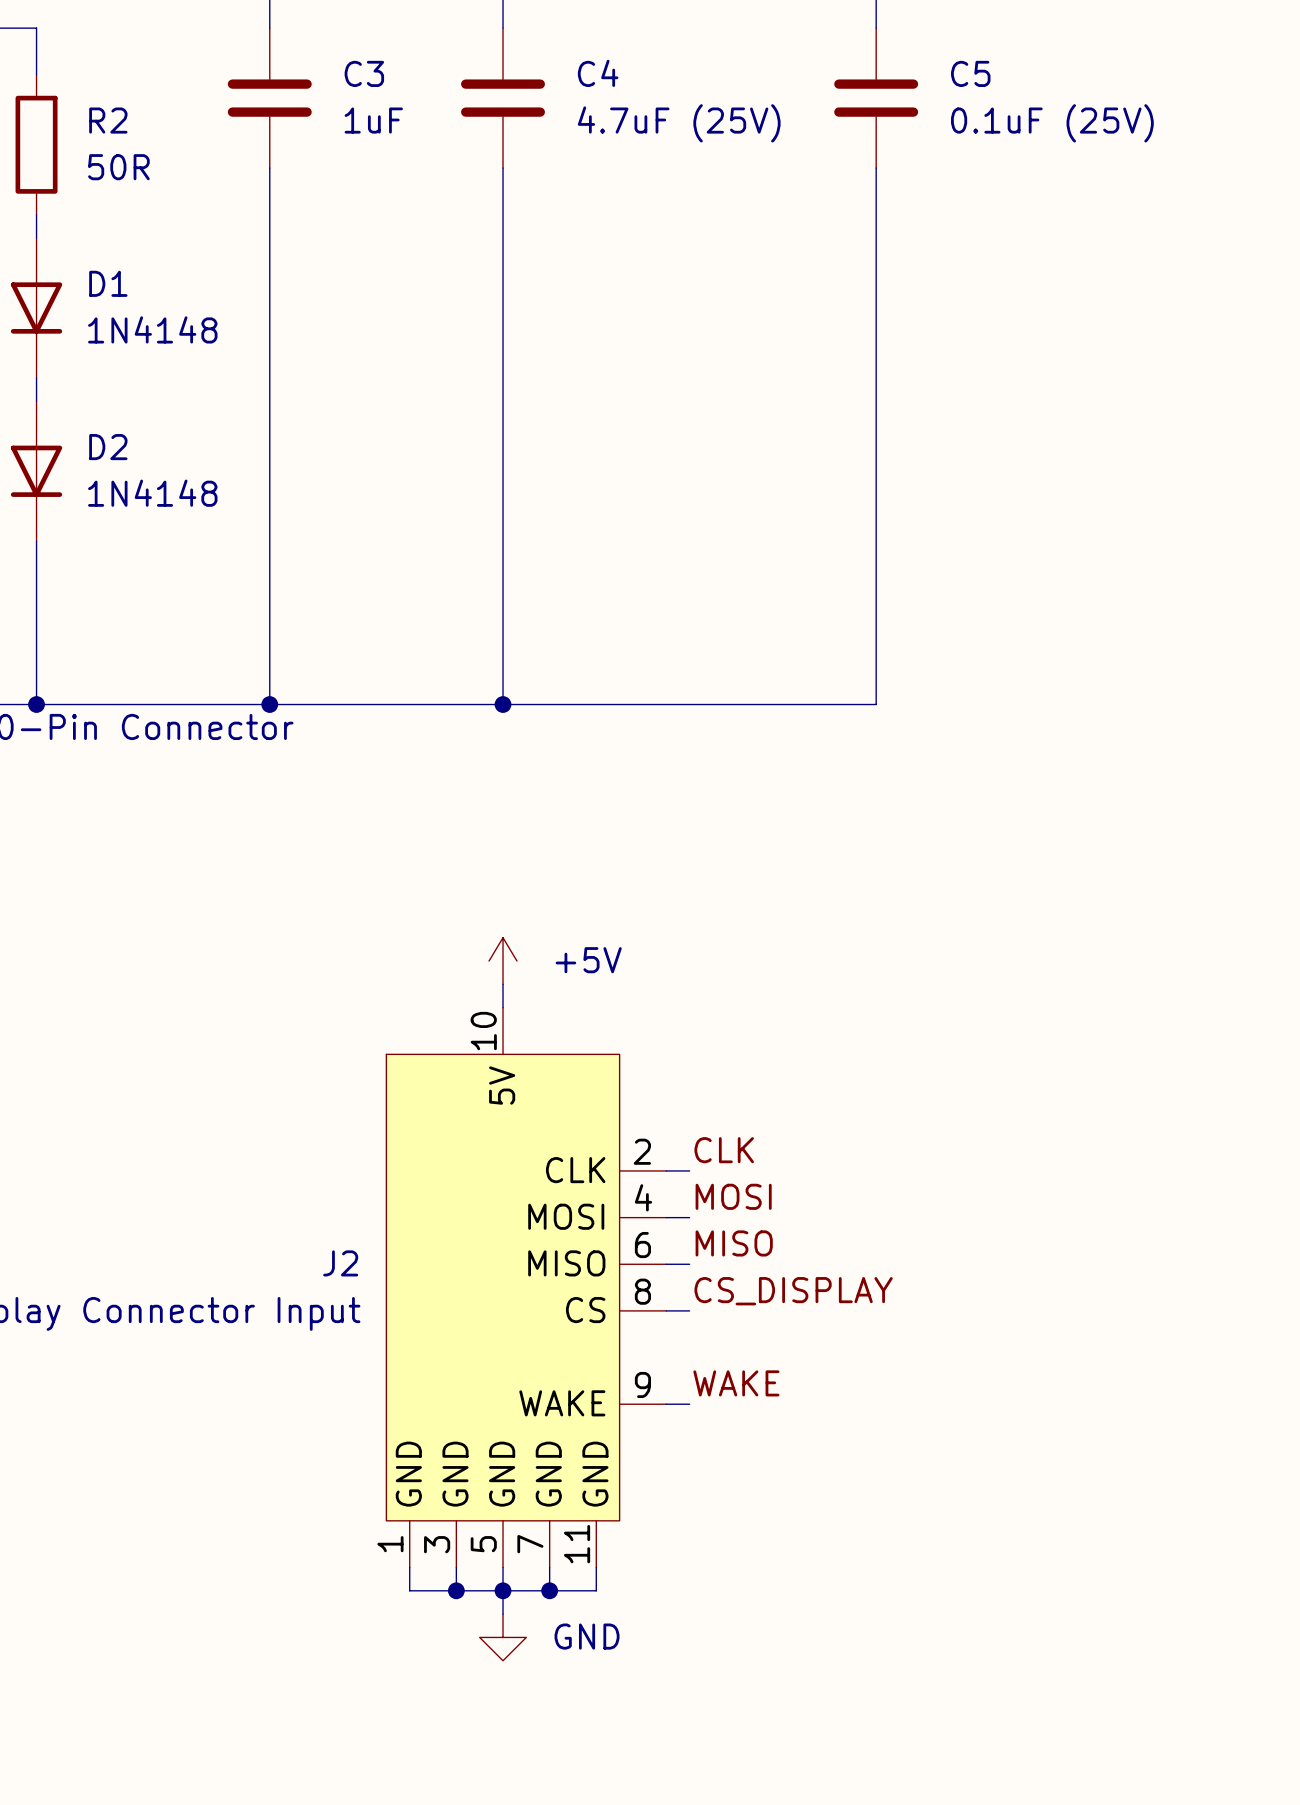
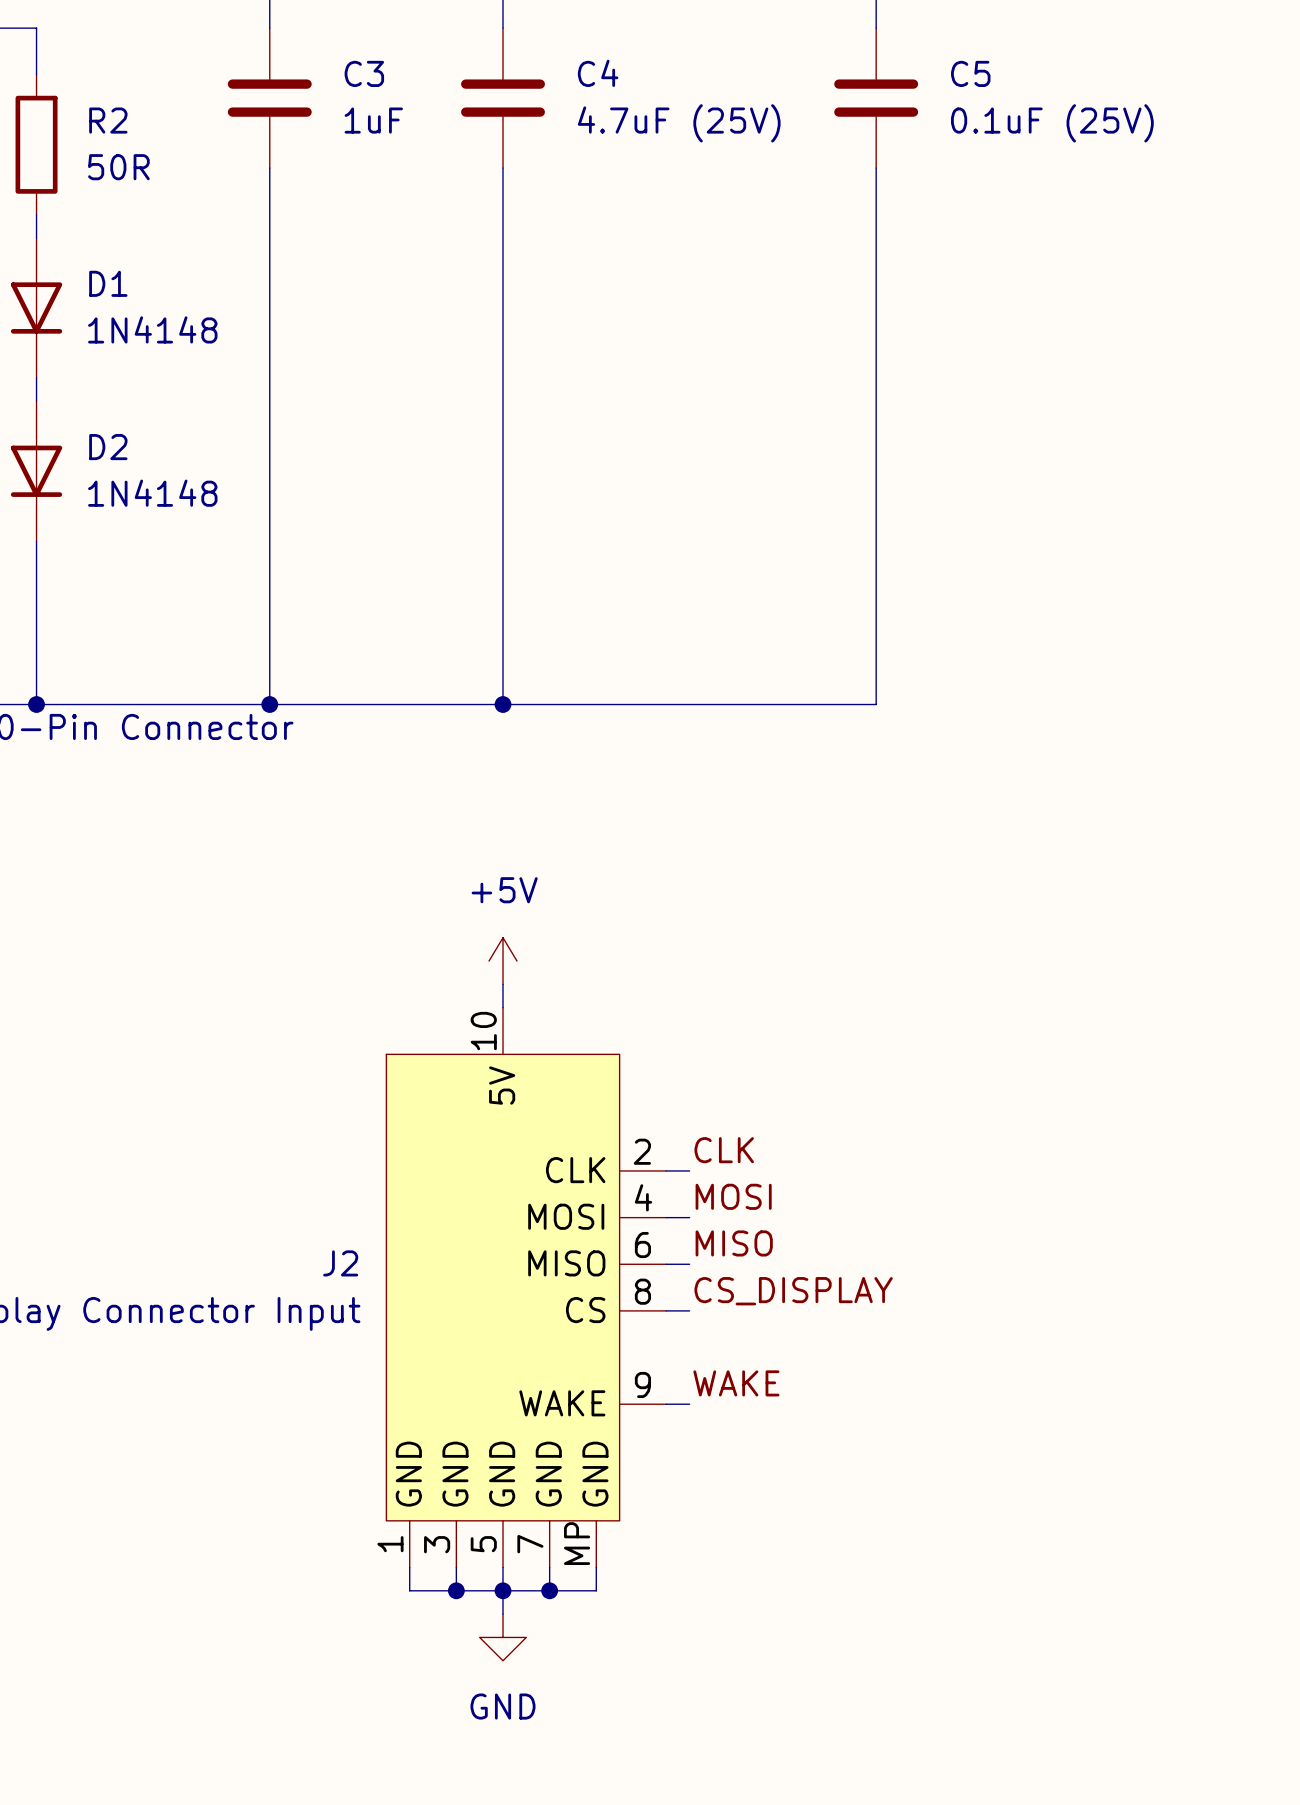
power symbol text position: +5V (588, 960) -> +5V (504, 890)
J2 pin number: 11 (577, 1544) -> MP (577, 1543)
power symbol text position: GND (587, 1636) -> GND (503, 1706)

